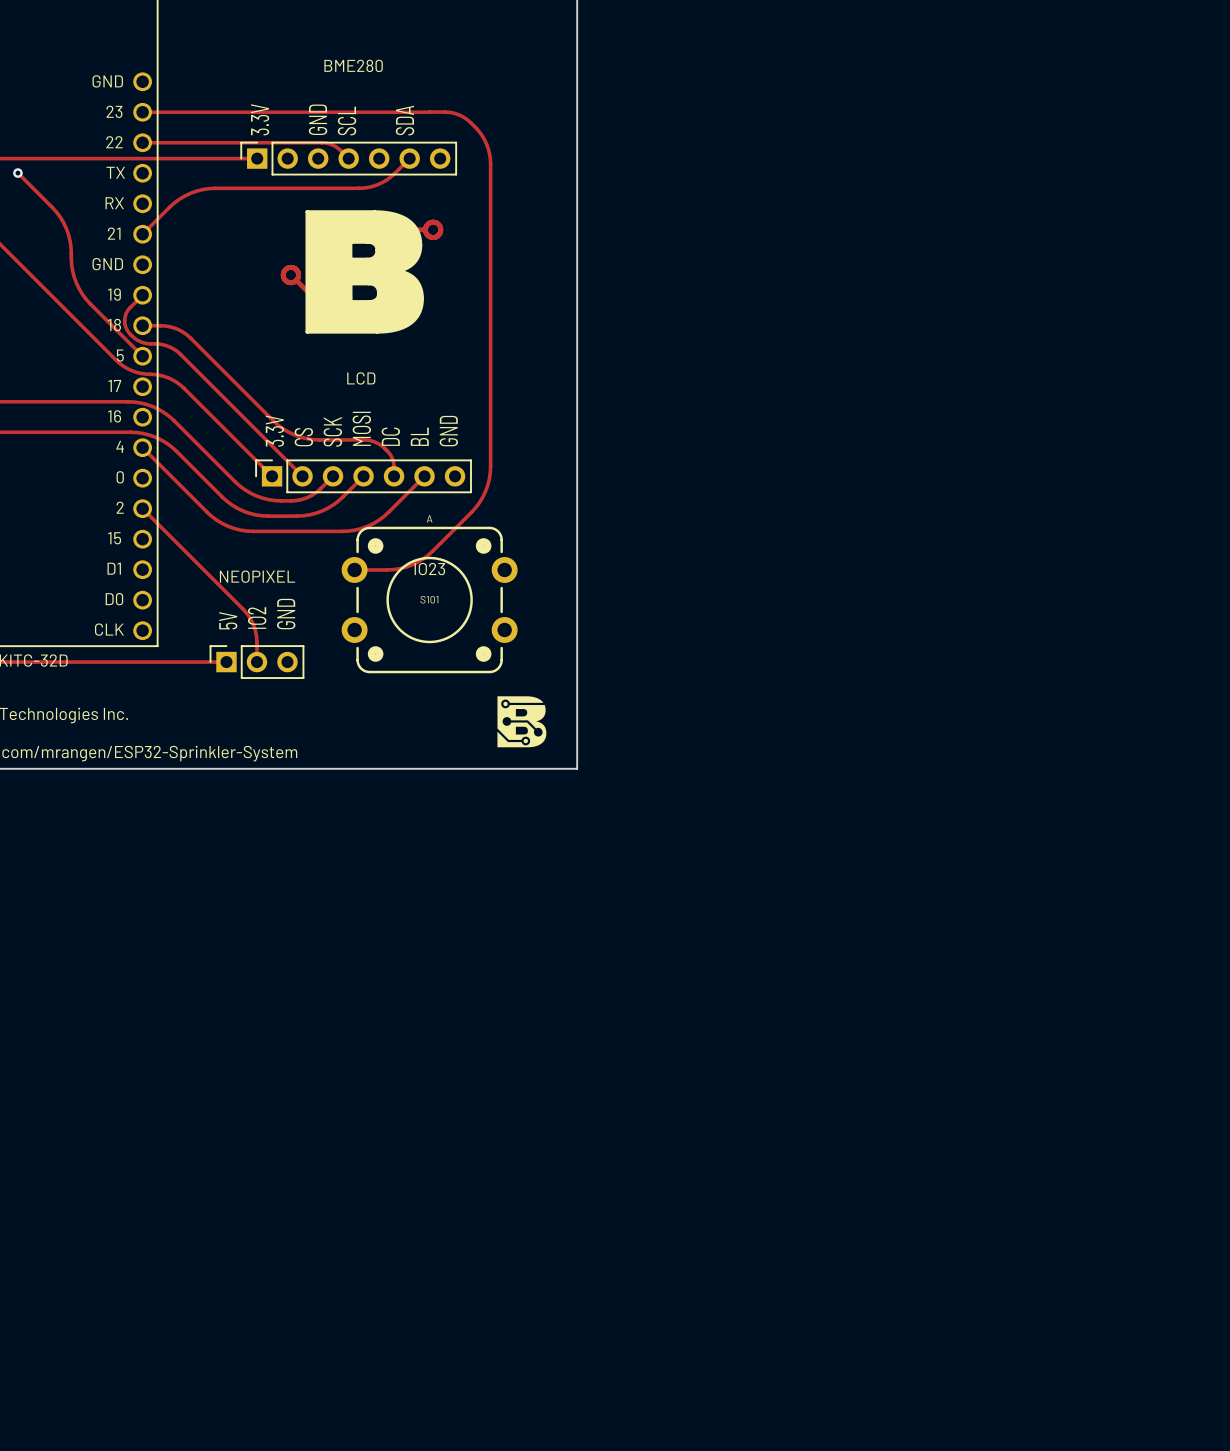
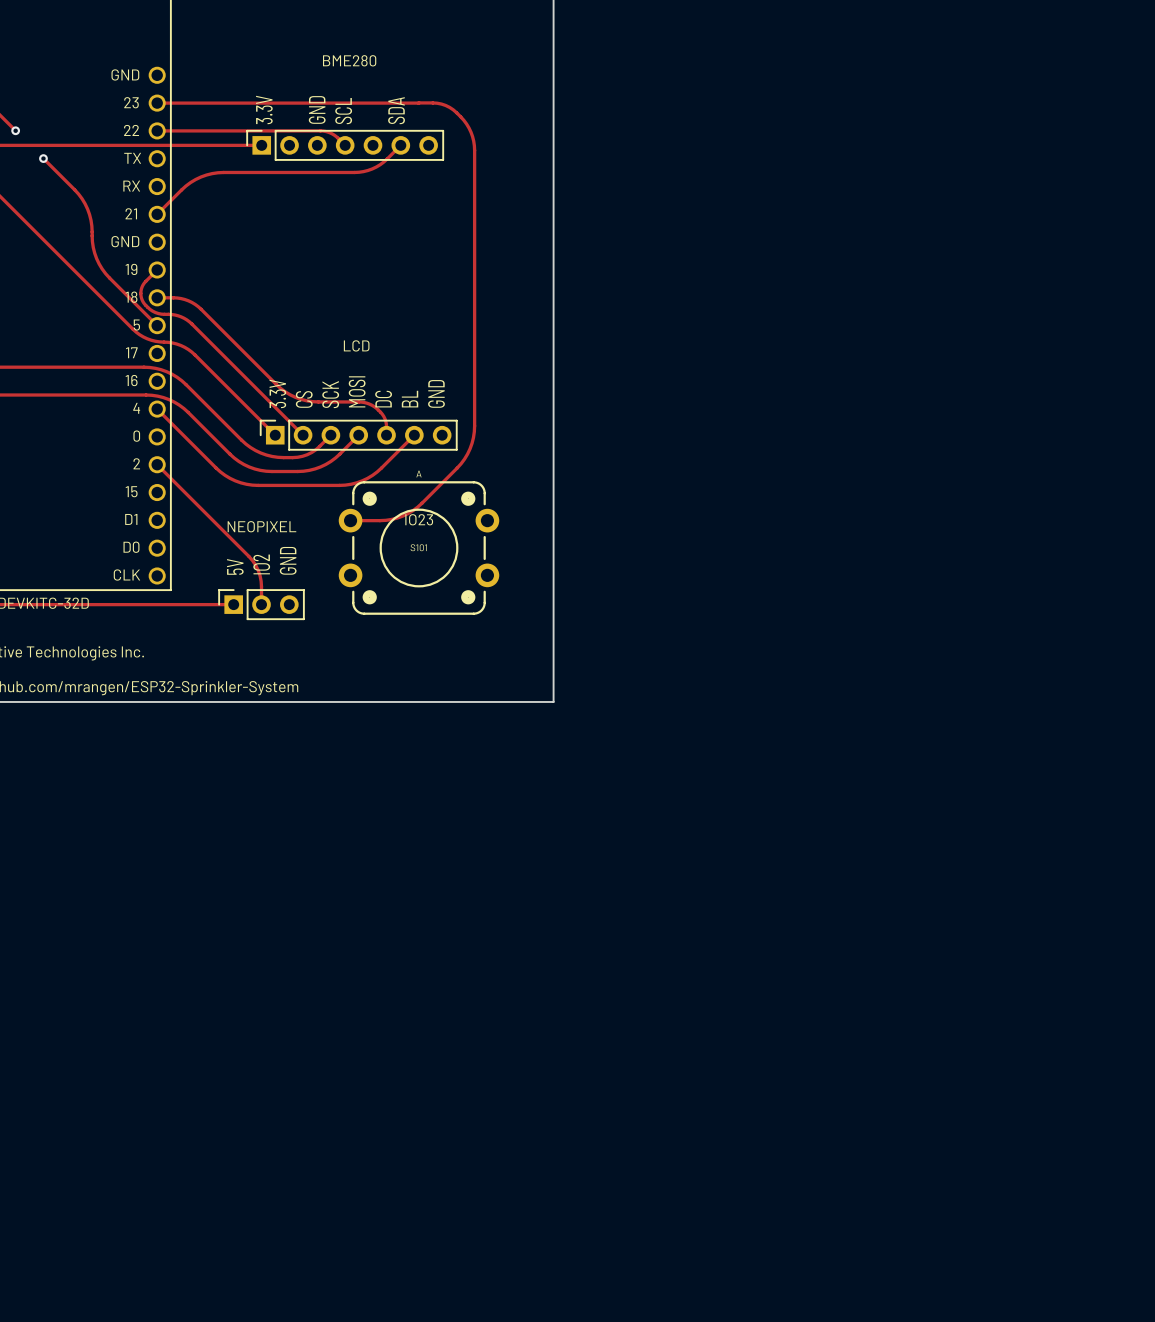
drawing: [280, 210, 444, 334] -> none
drawing: [494, 696, 547, 748] -> none

